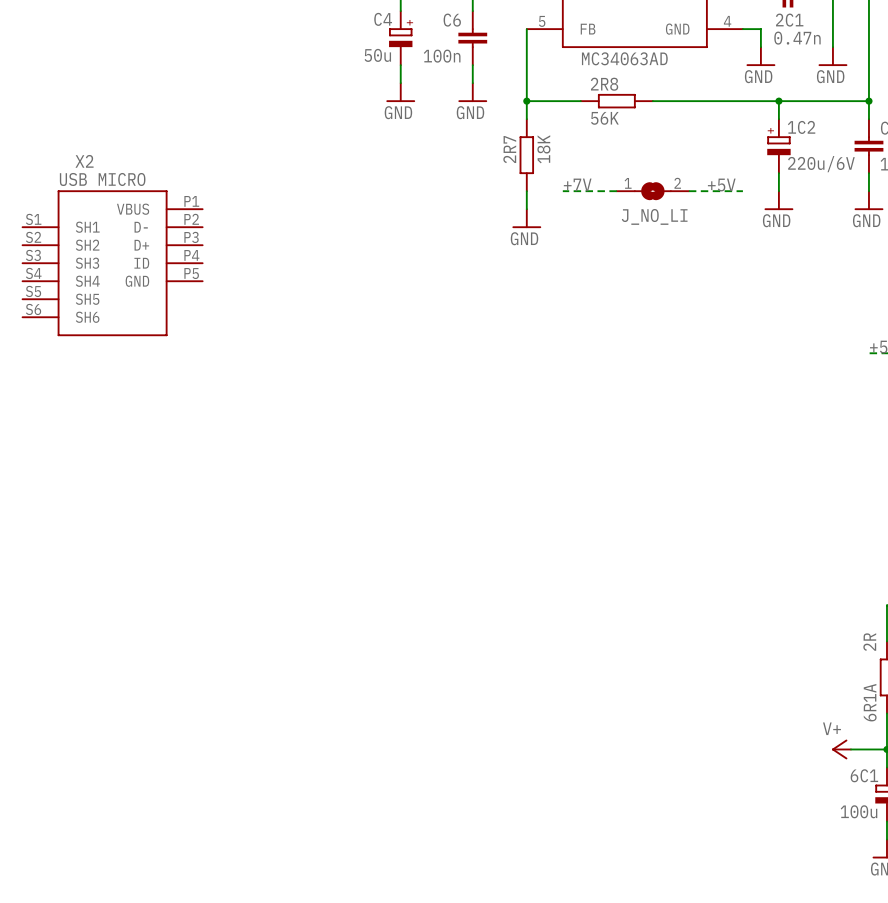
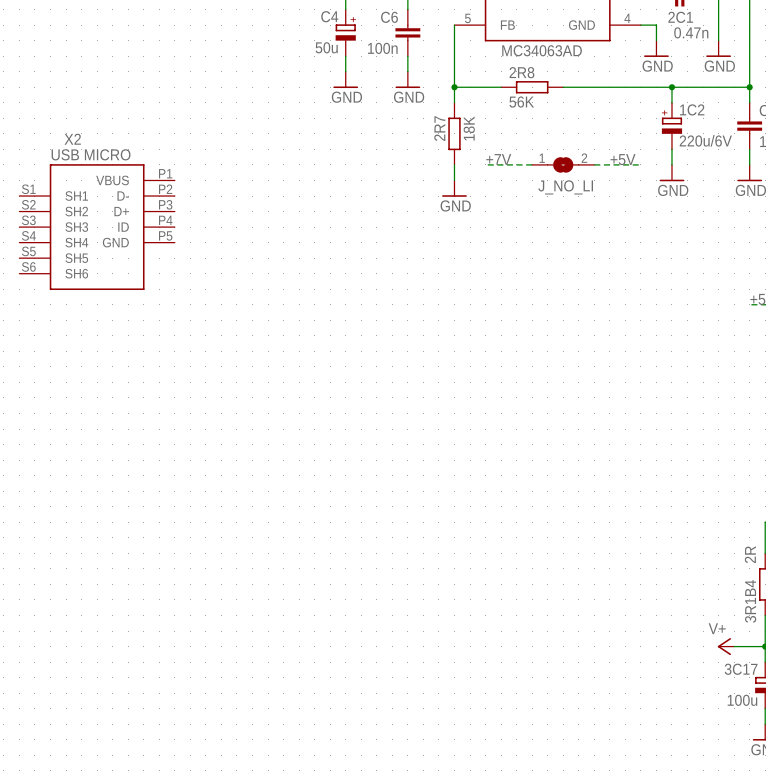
6R1A name: 6R1A (870, 702) -> 3R1B4 (750, 601)
6C1 name: 6C1 (864, 775) -> 3C17 (741, 669)

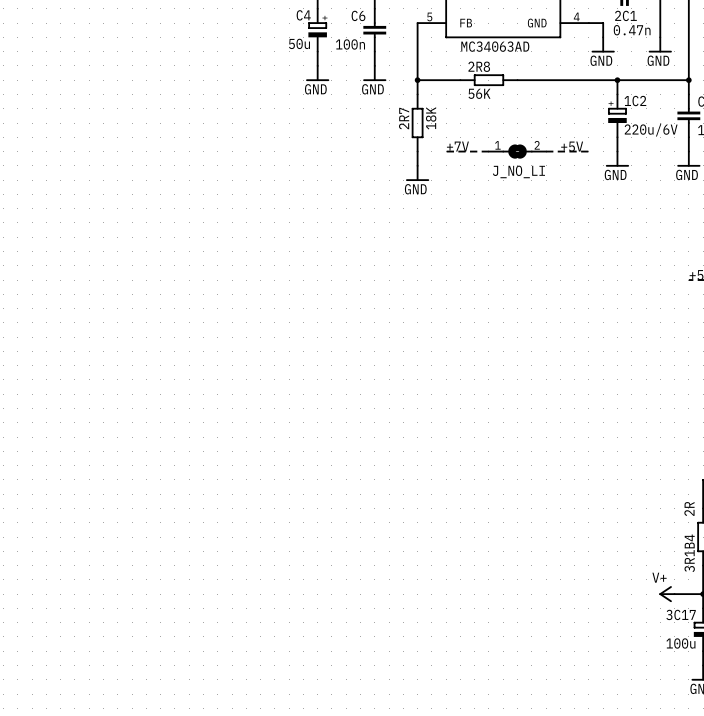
X2: USB MICRO (97, 227) -> none

